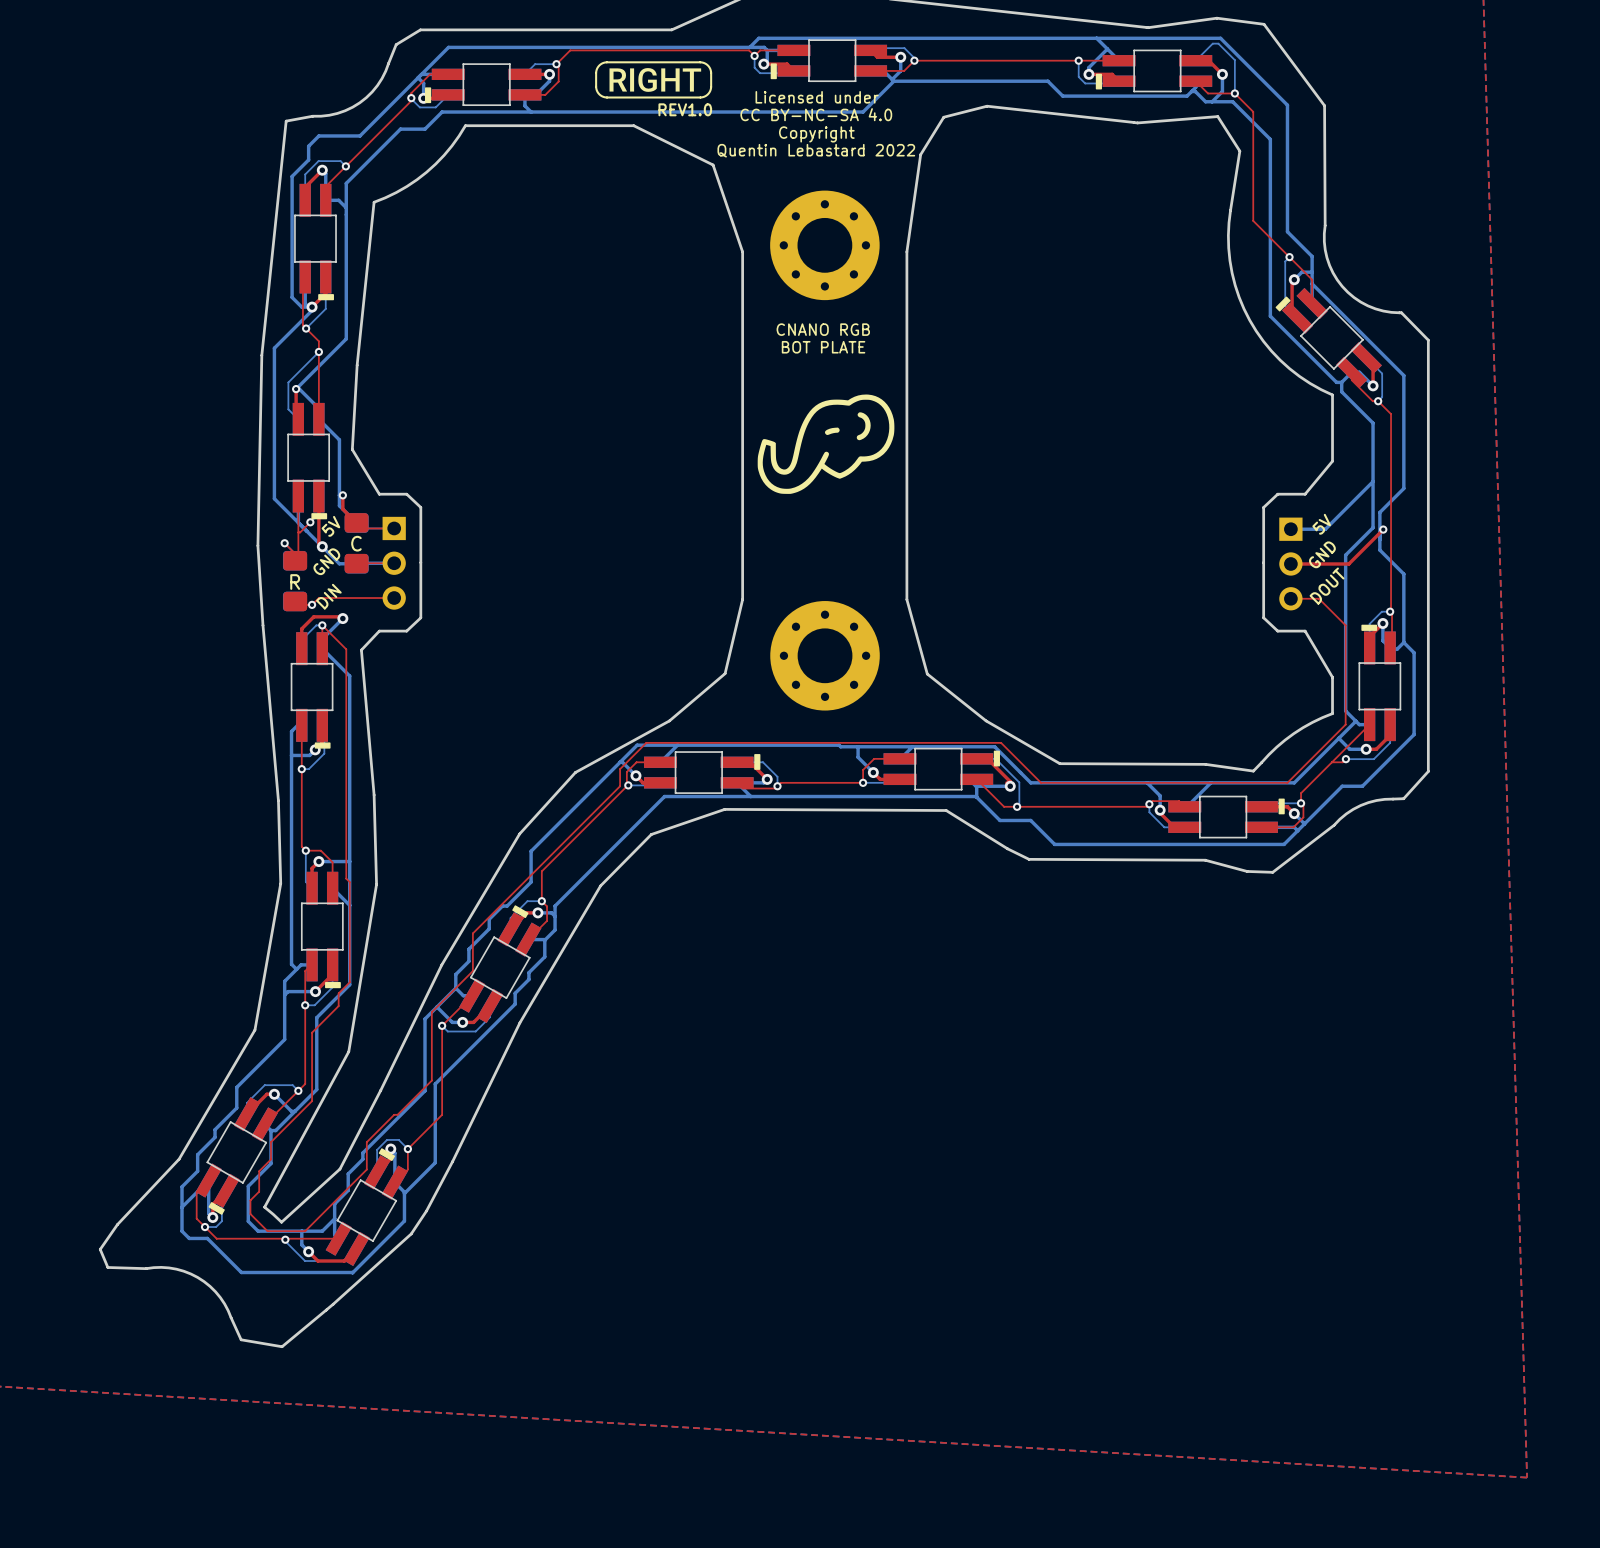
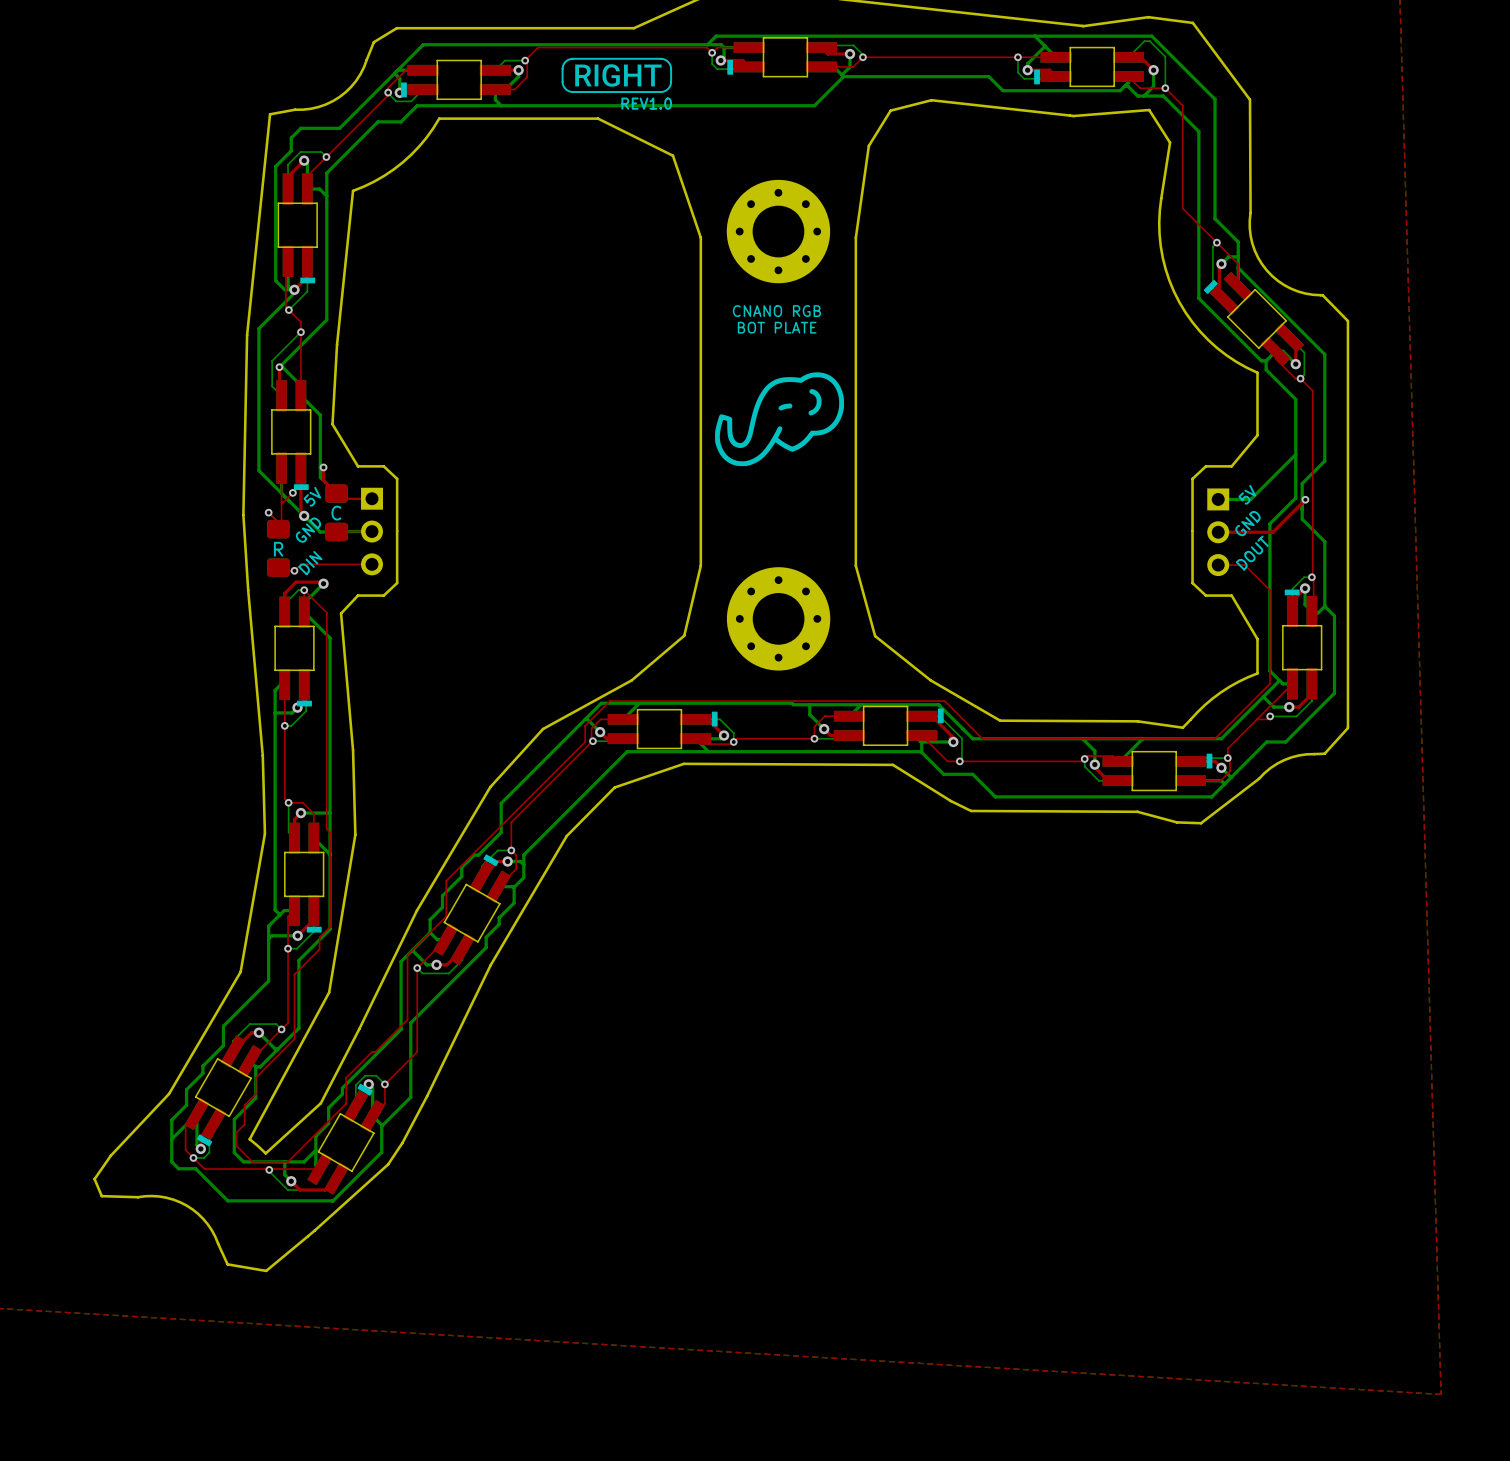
text: Licensed under (817, 97) -> none
text: CC BY-NC-SA 4.0 (816, 114) -> none
text: Copyright (816, 134) -> none
text: Quentin Lebastard 2022 (816, 150) -> none

